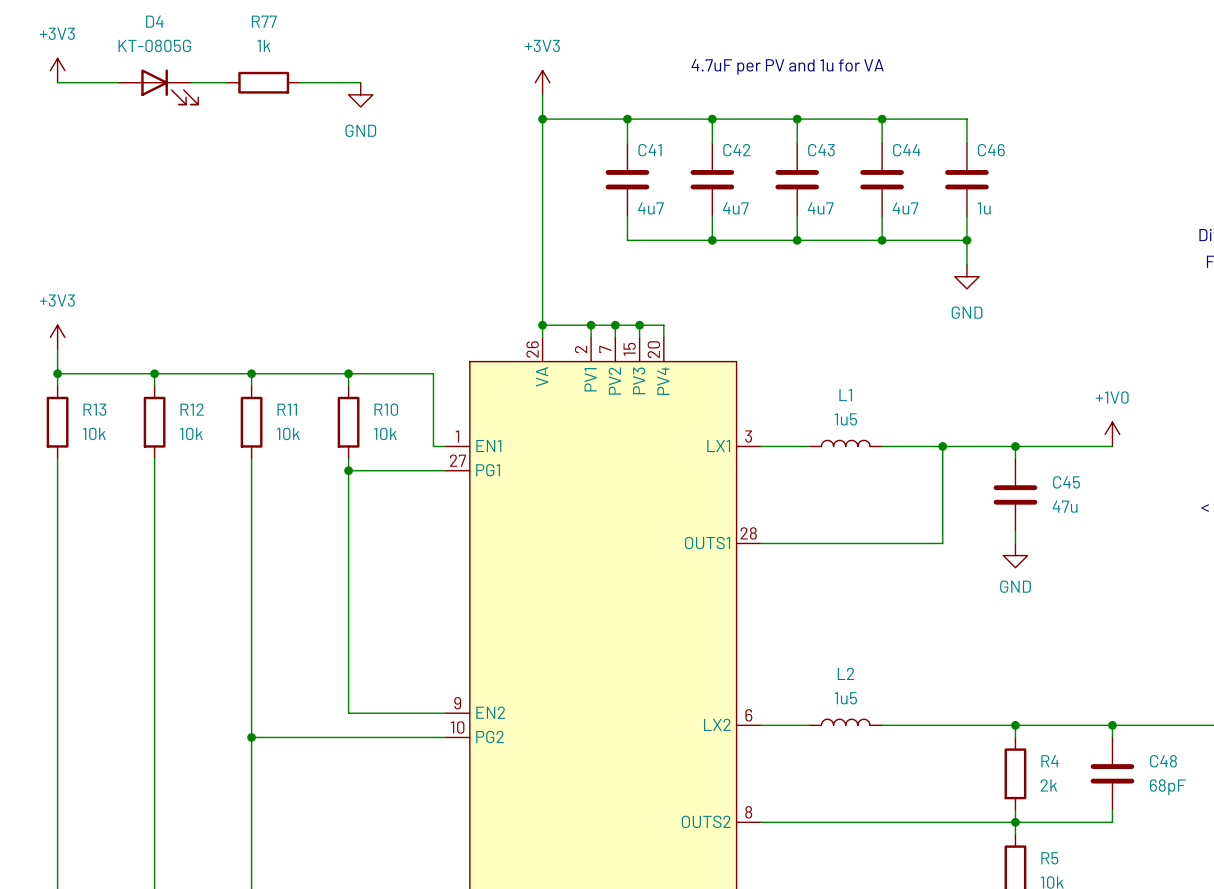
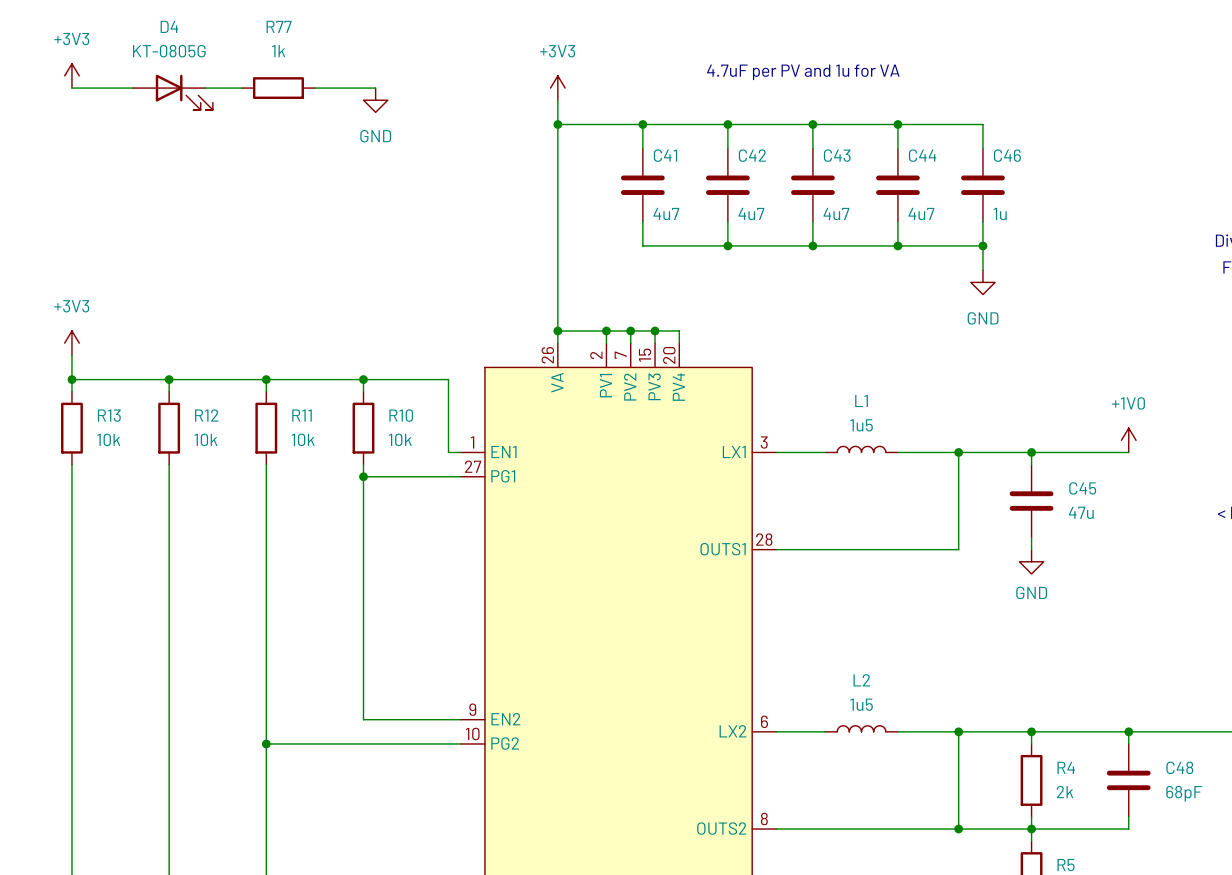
wire: none -> (958, 731) (958, 829)
junction: none -> (958, 731)
junction: none -> (958, 829)

